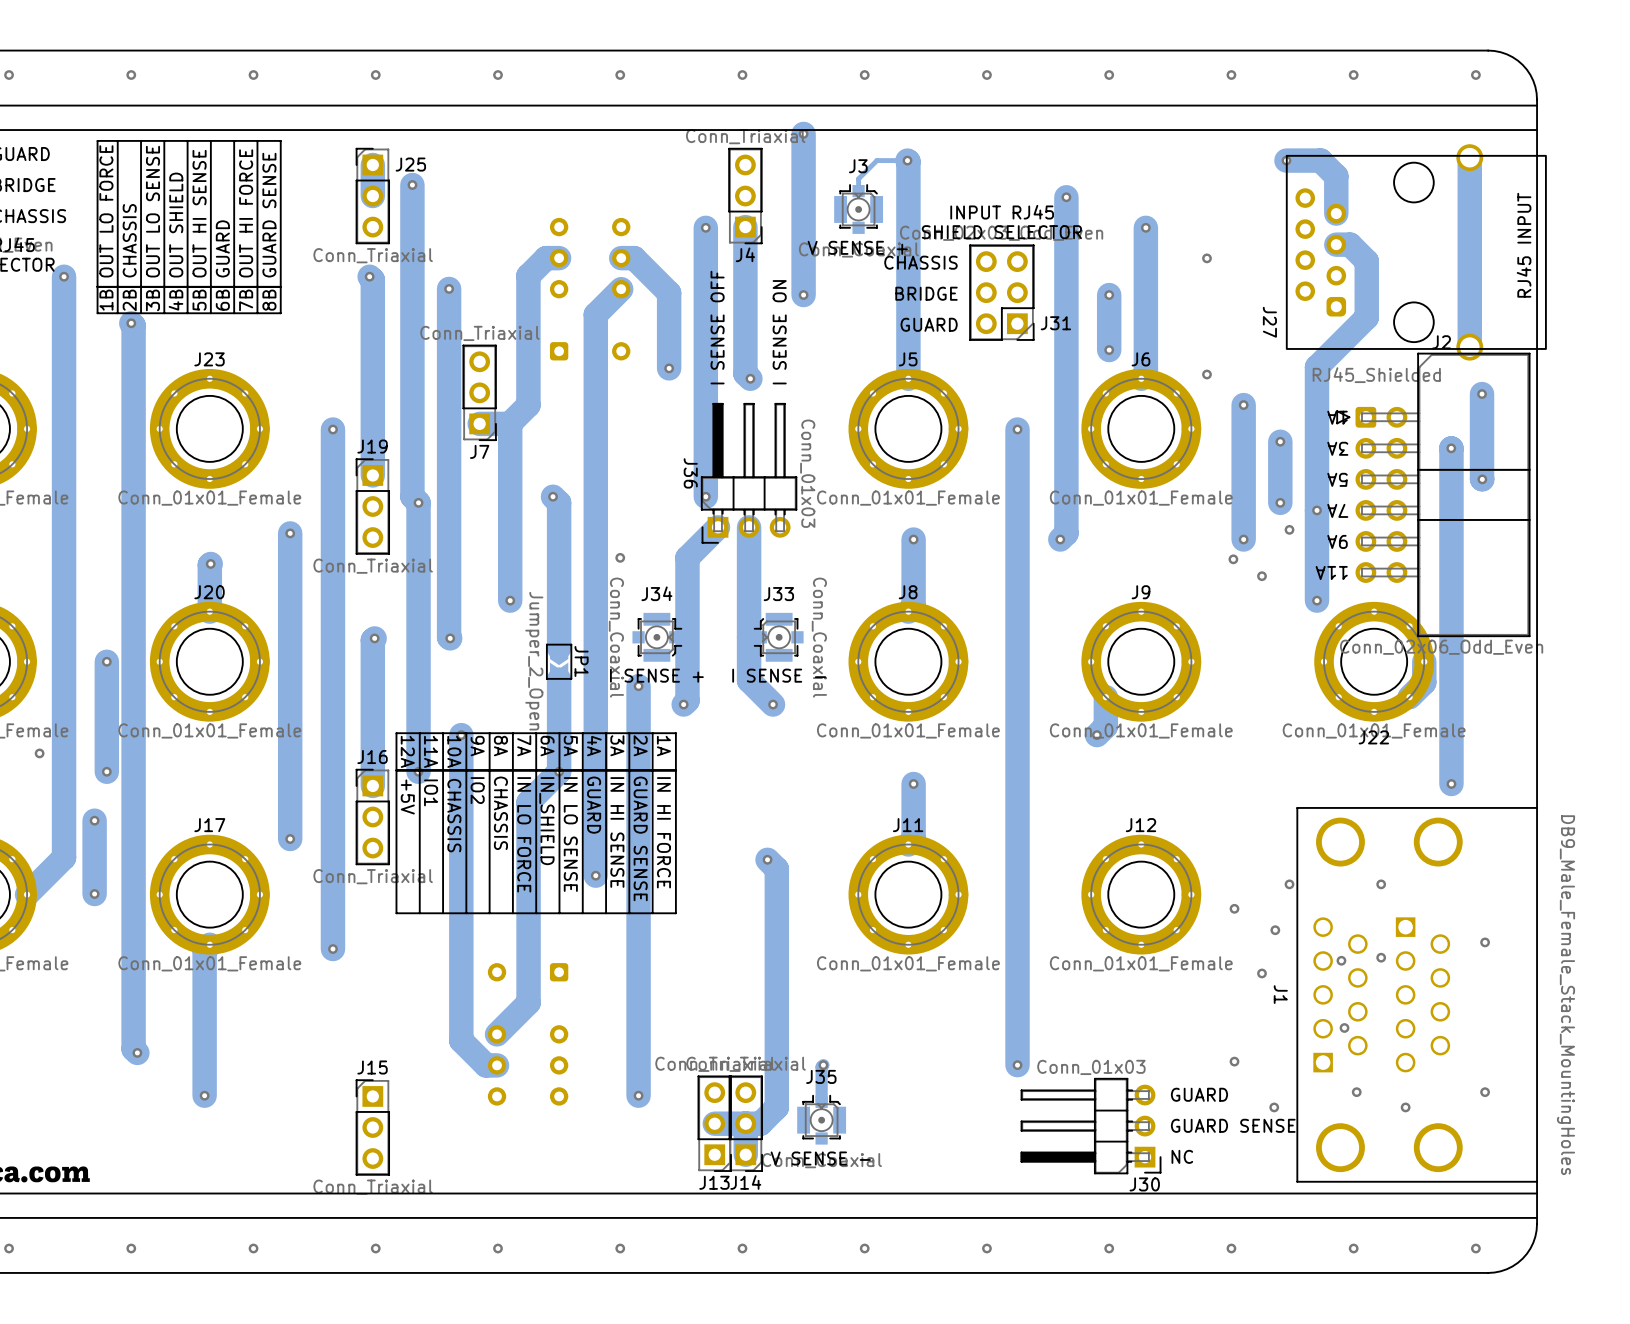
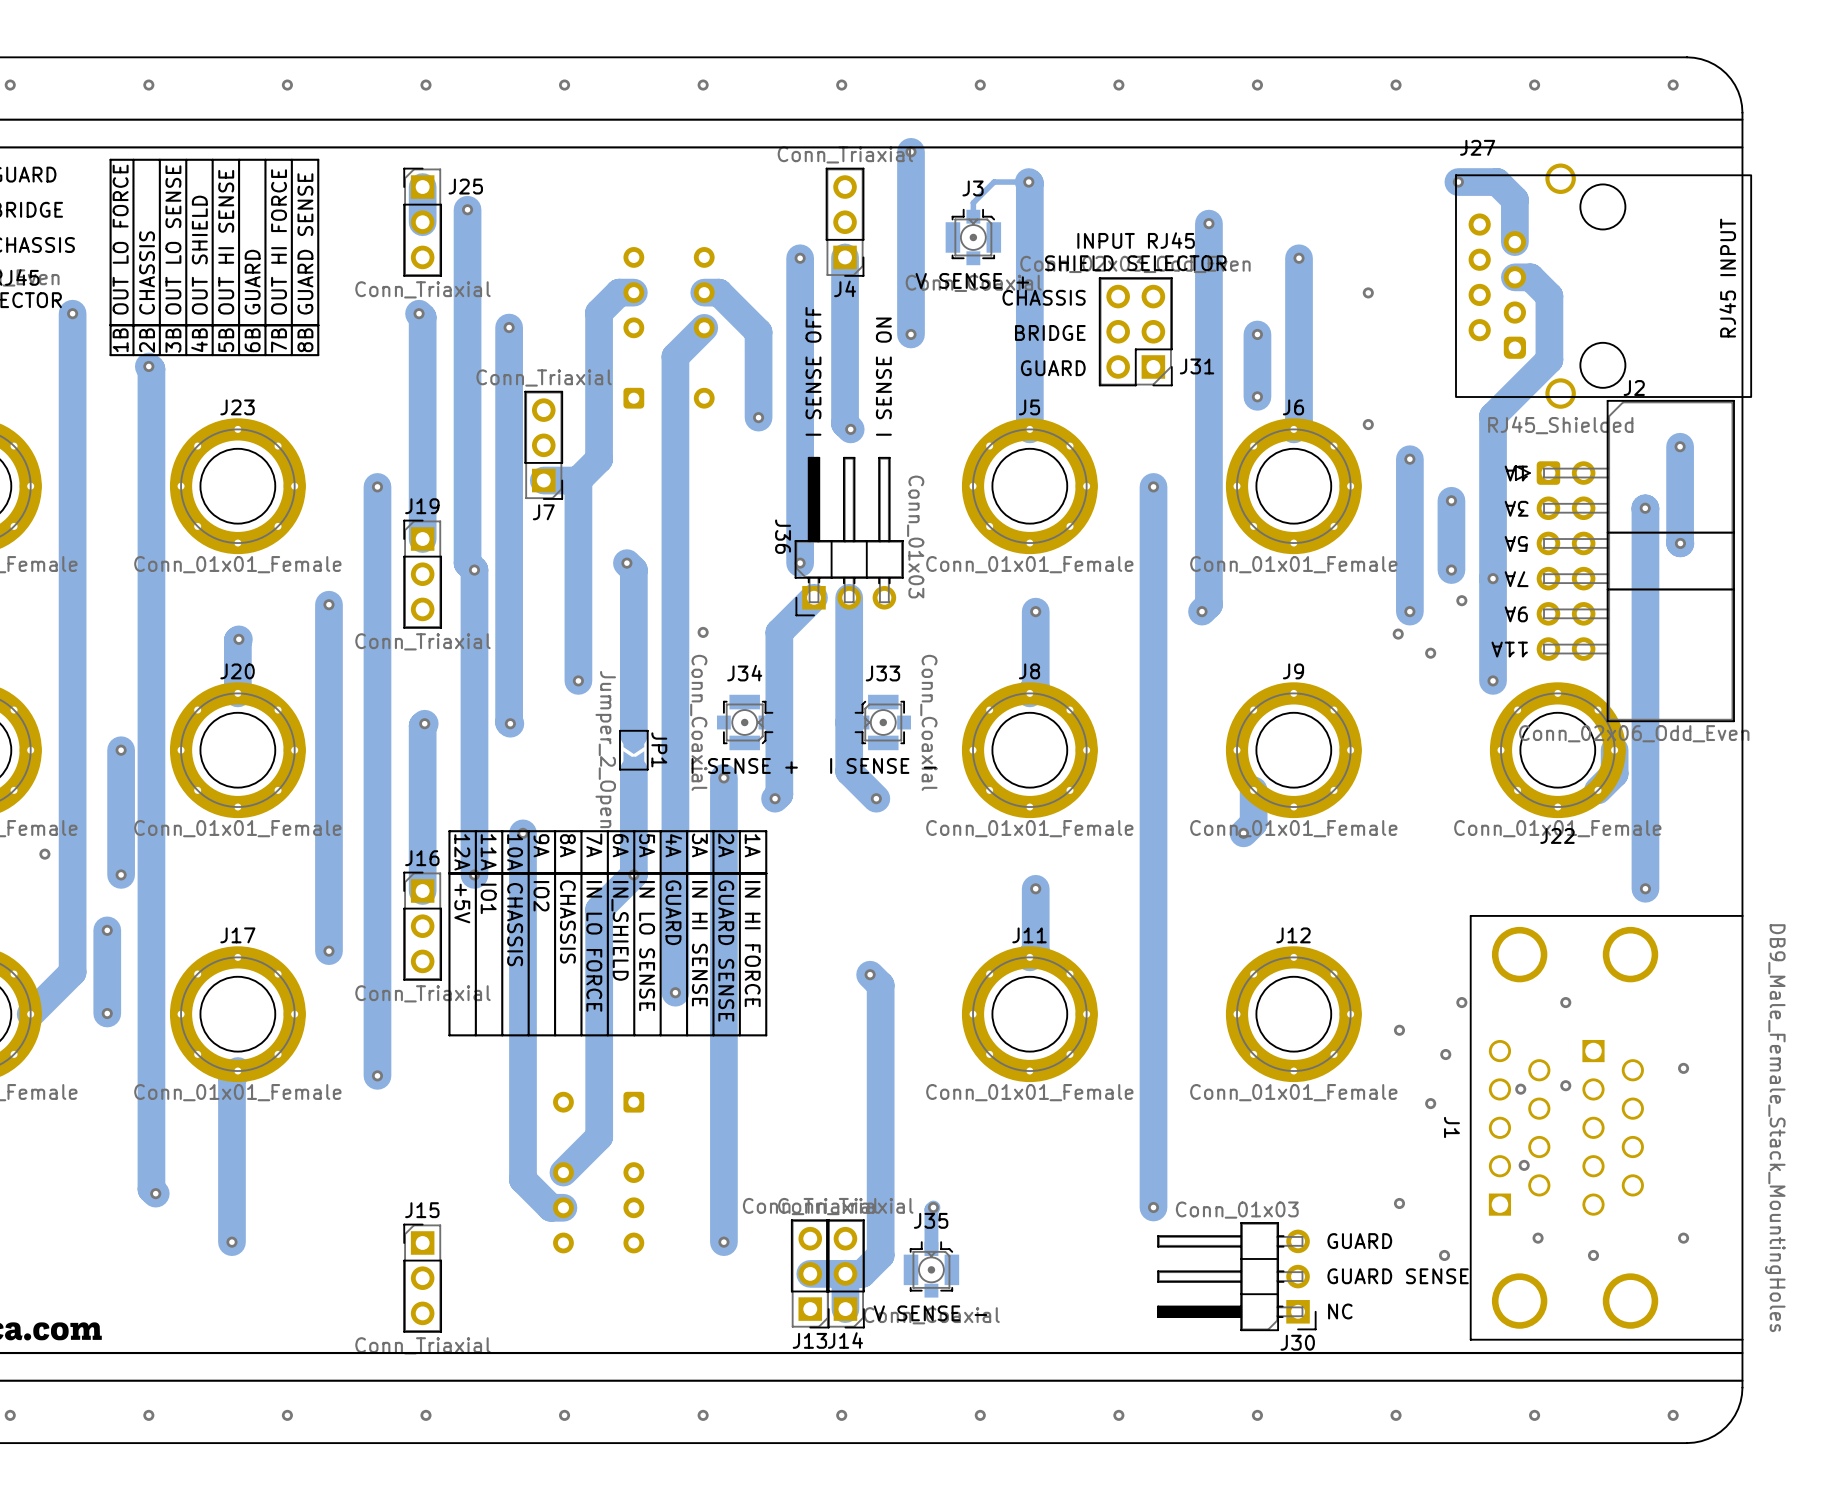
J27 footprint: [1286, 144, 1547, 361] -> [1455, 163, 1752, 409]
track: (1469, 157) (1469, 347) -> none
J27 name position: J27 (1269, 322) -> J27 (1477, 147)

